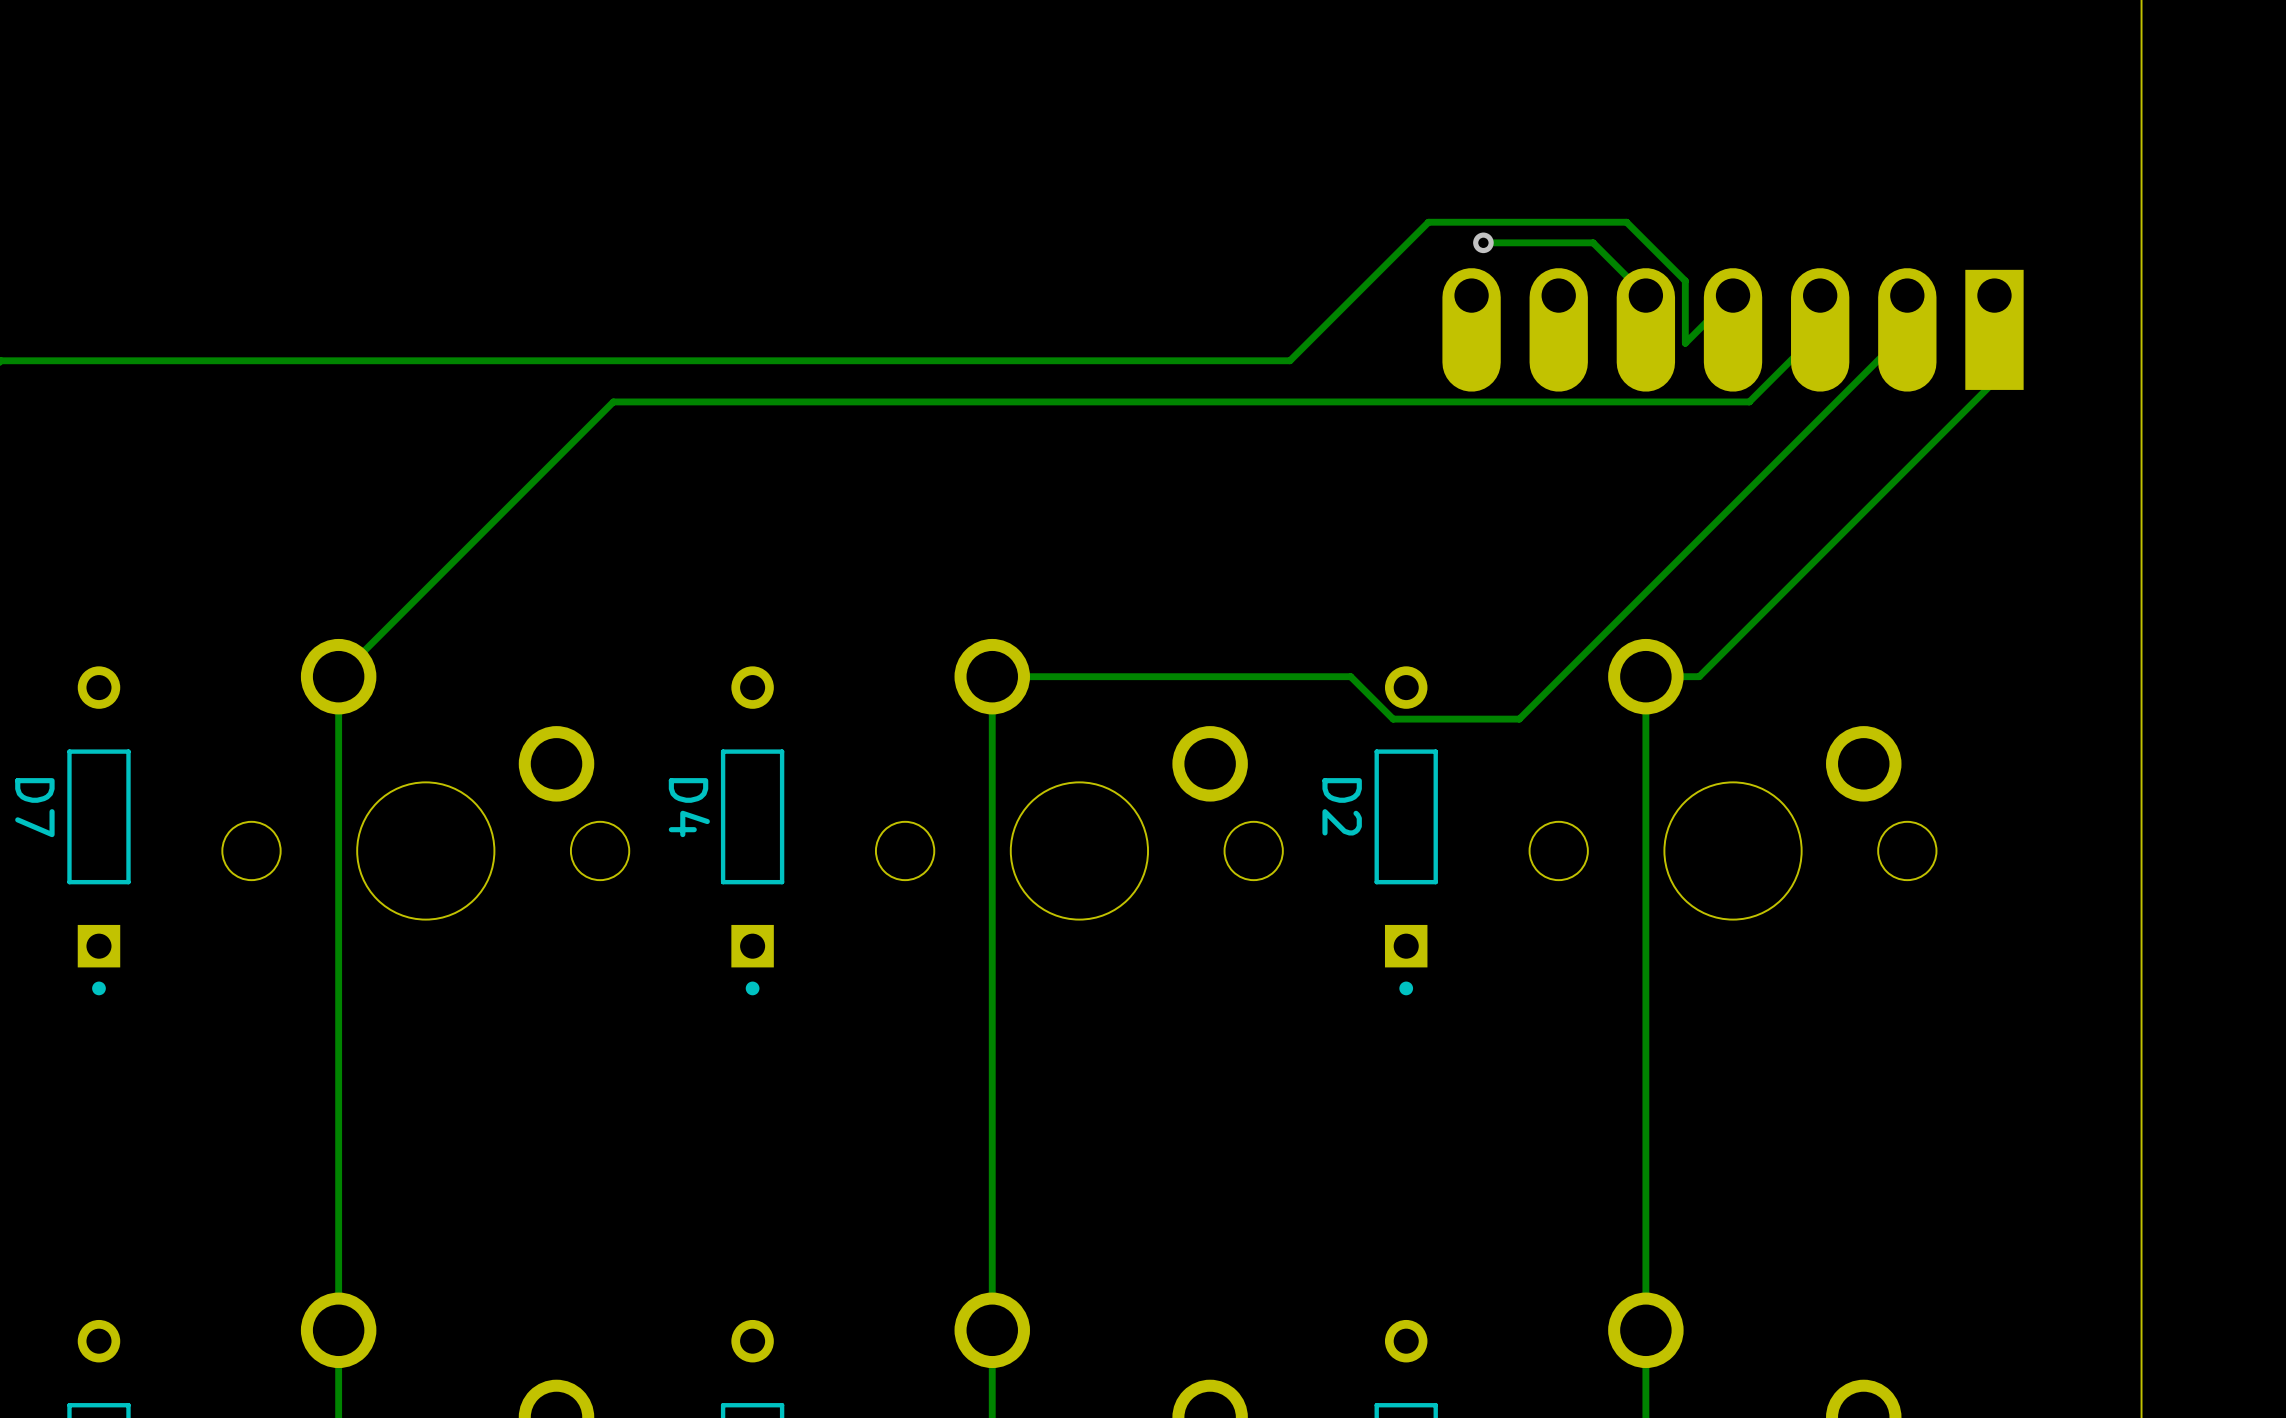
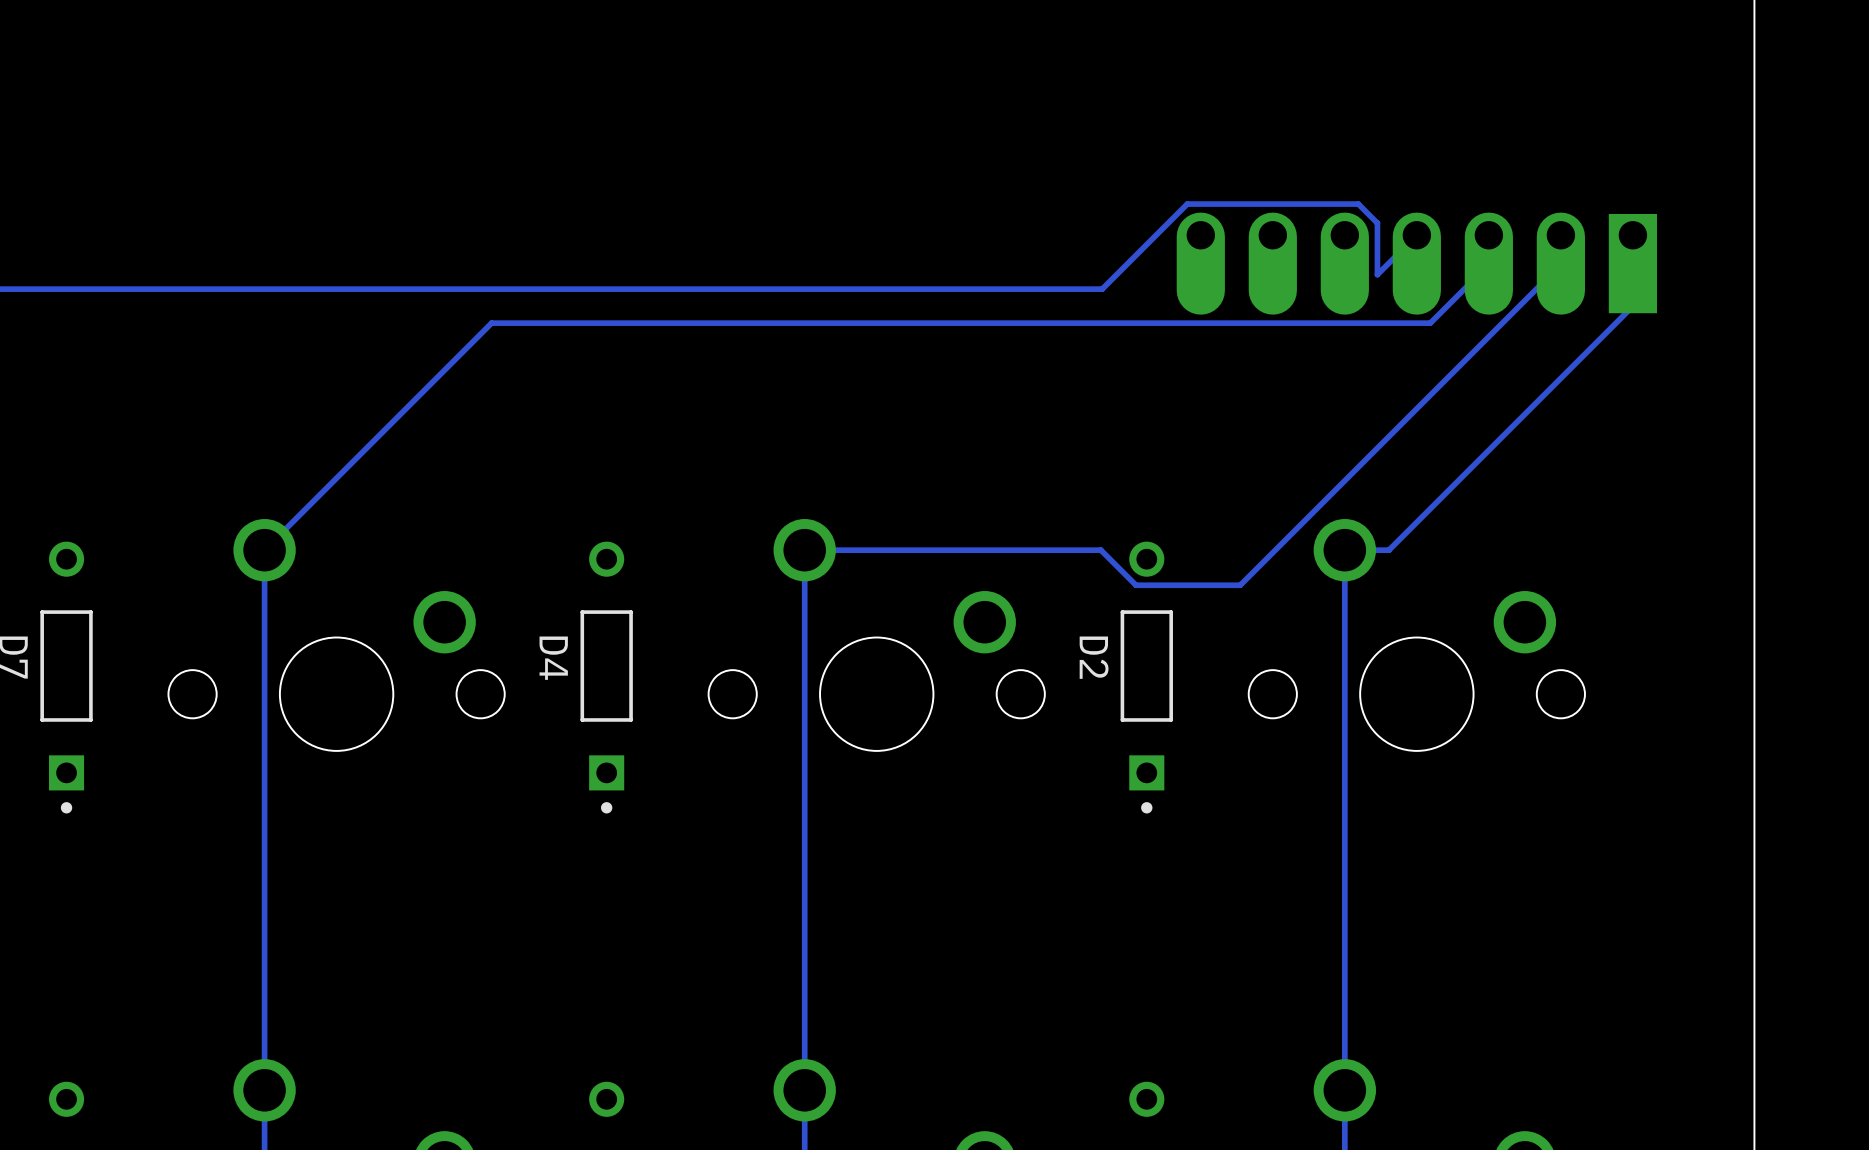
track: (1483, 242) (1593, 242) (1645, 295) -> none
via: (1483, 242) -> none
track: (1662, 257) (1626, 222) (1428, 222) (1289, 360) -> (1358, 204) (1187, 204) (1102, 289) (1050, 289)

